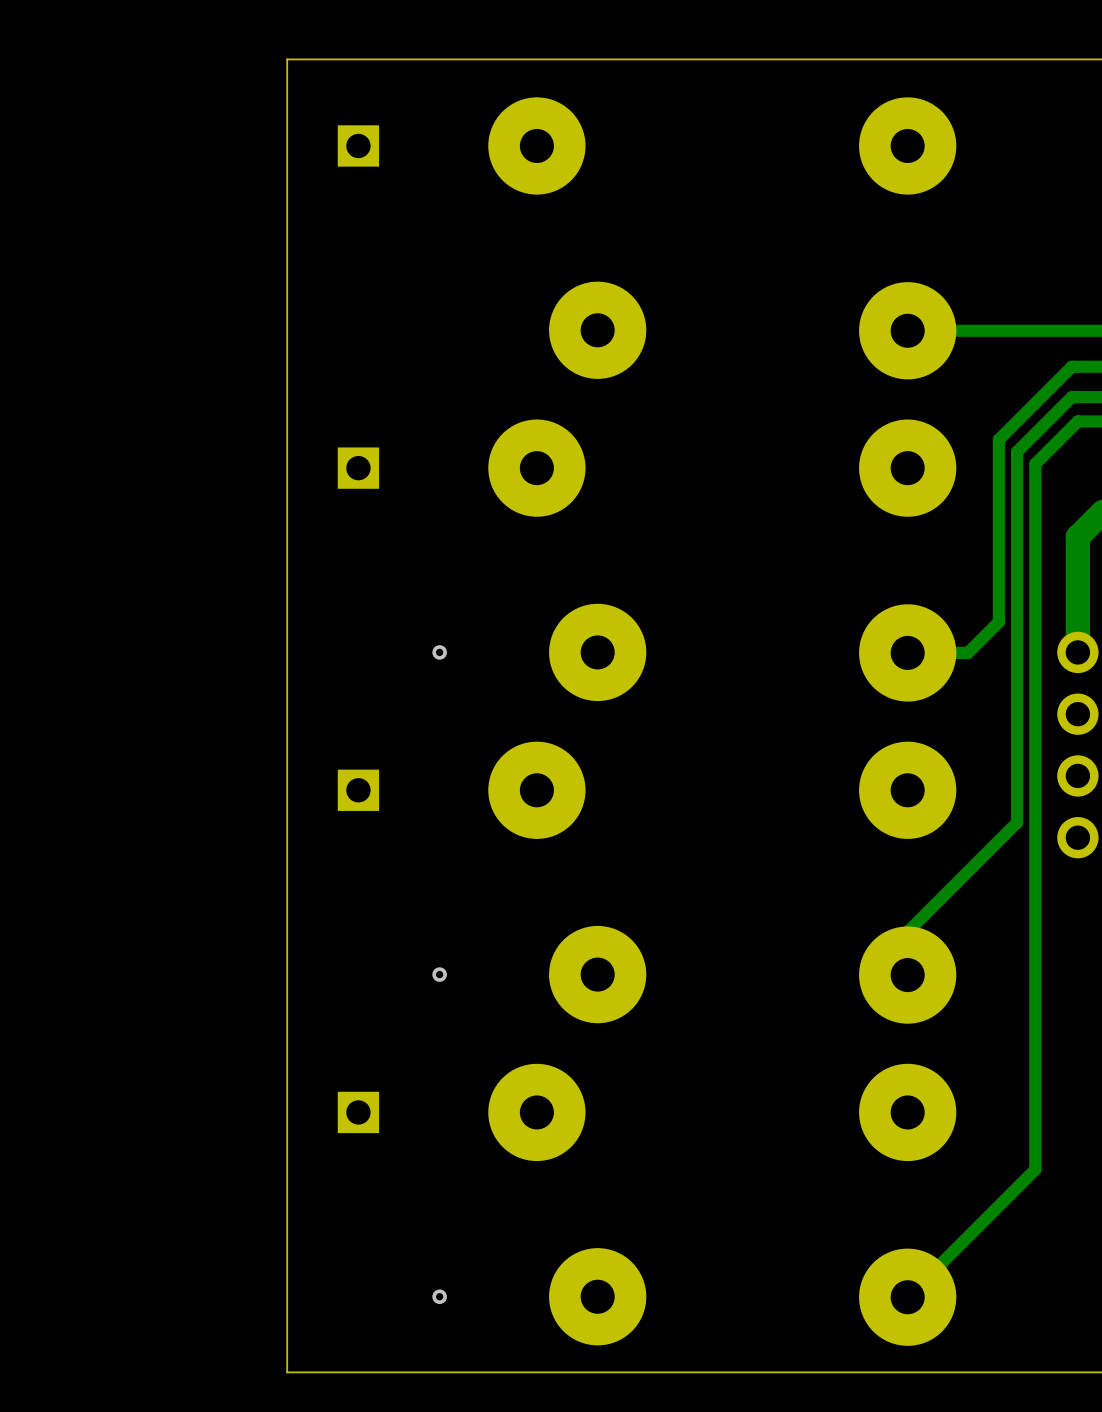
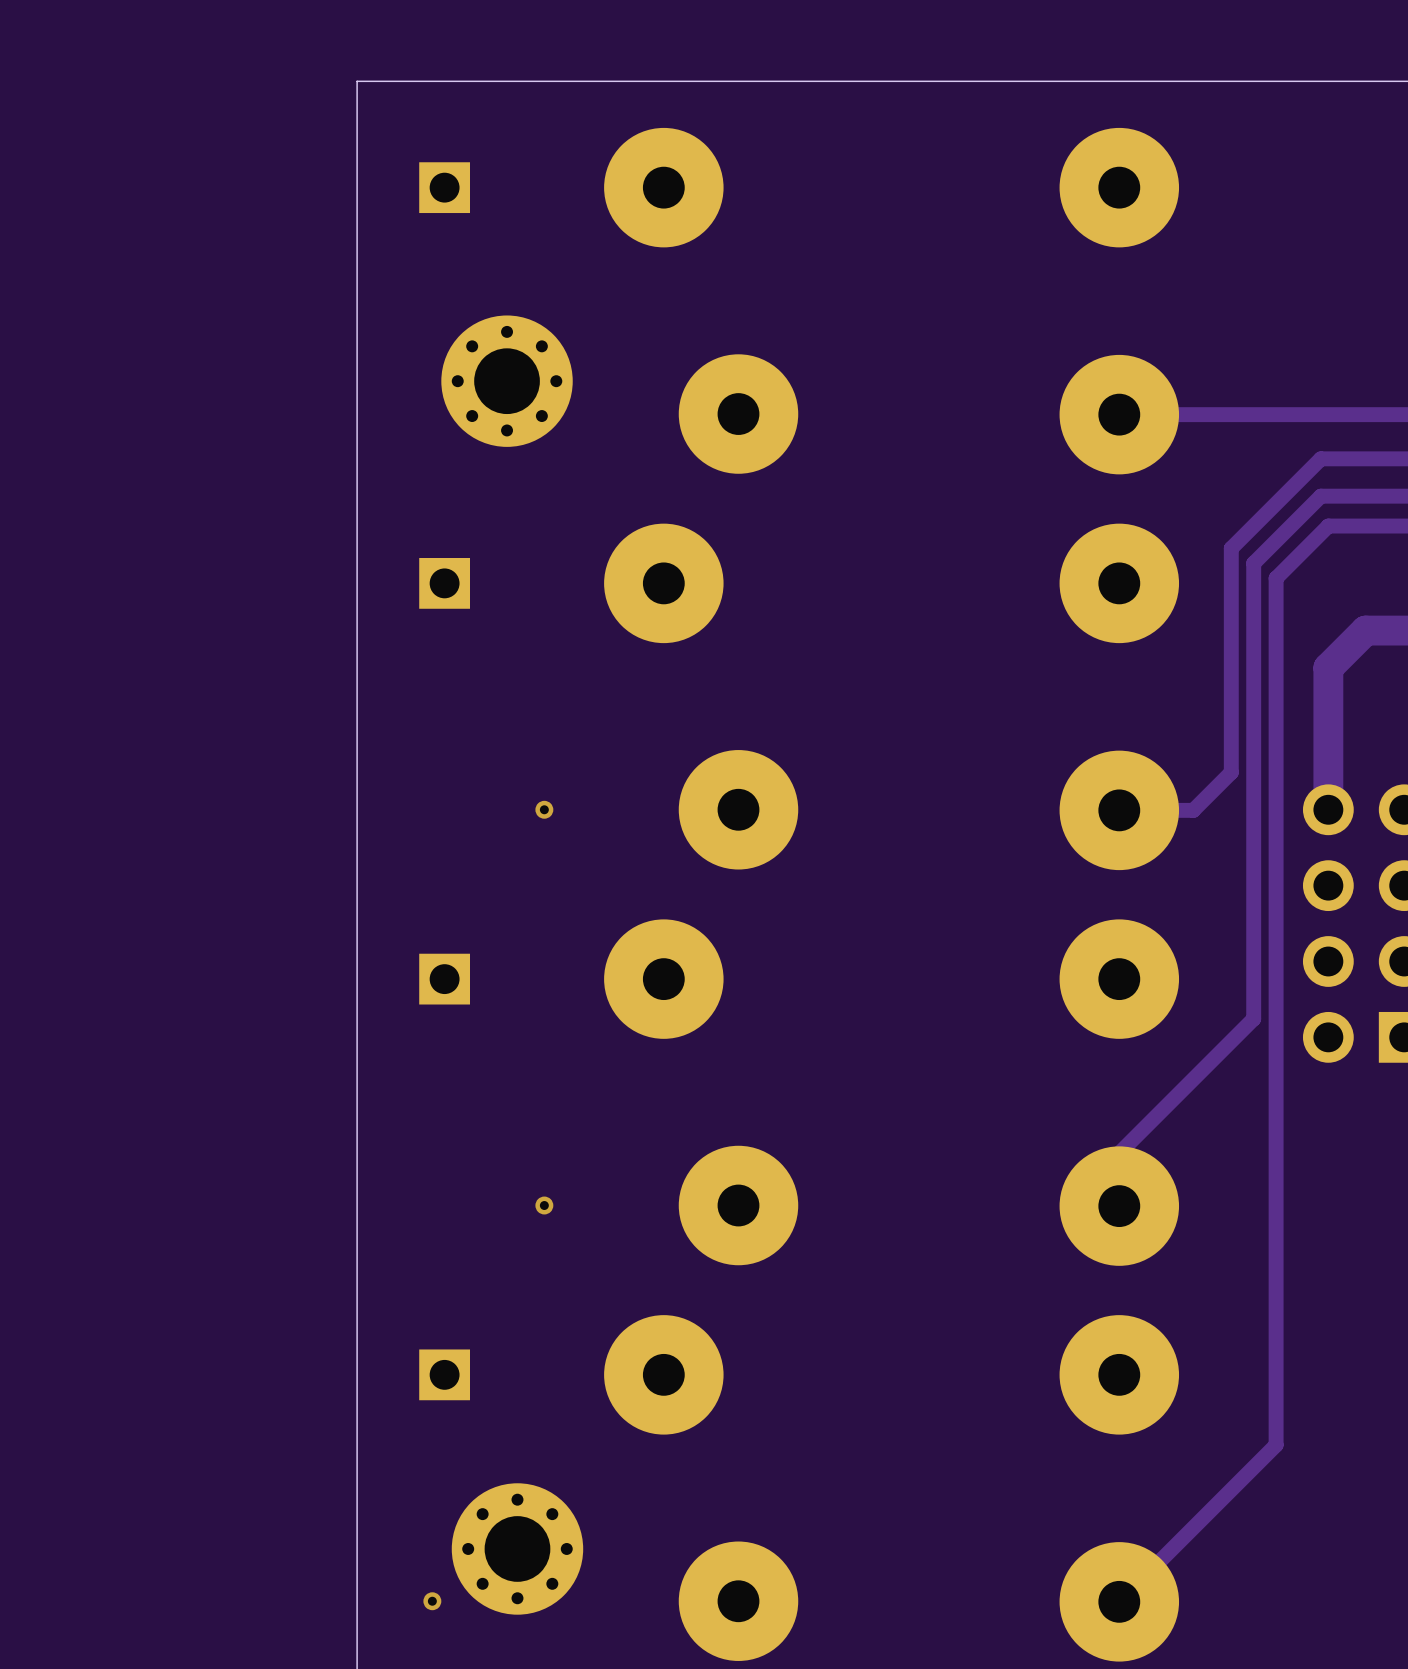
part: none -> (507, 381)
part: none -> (517, 1548)
via position: (439, 1296) -> (432, 1601)

